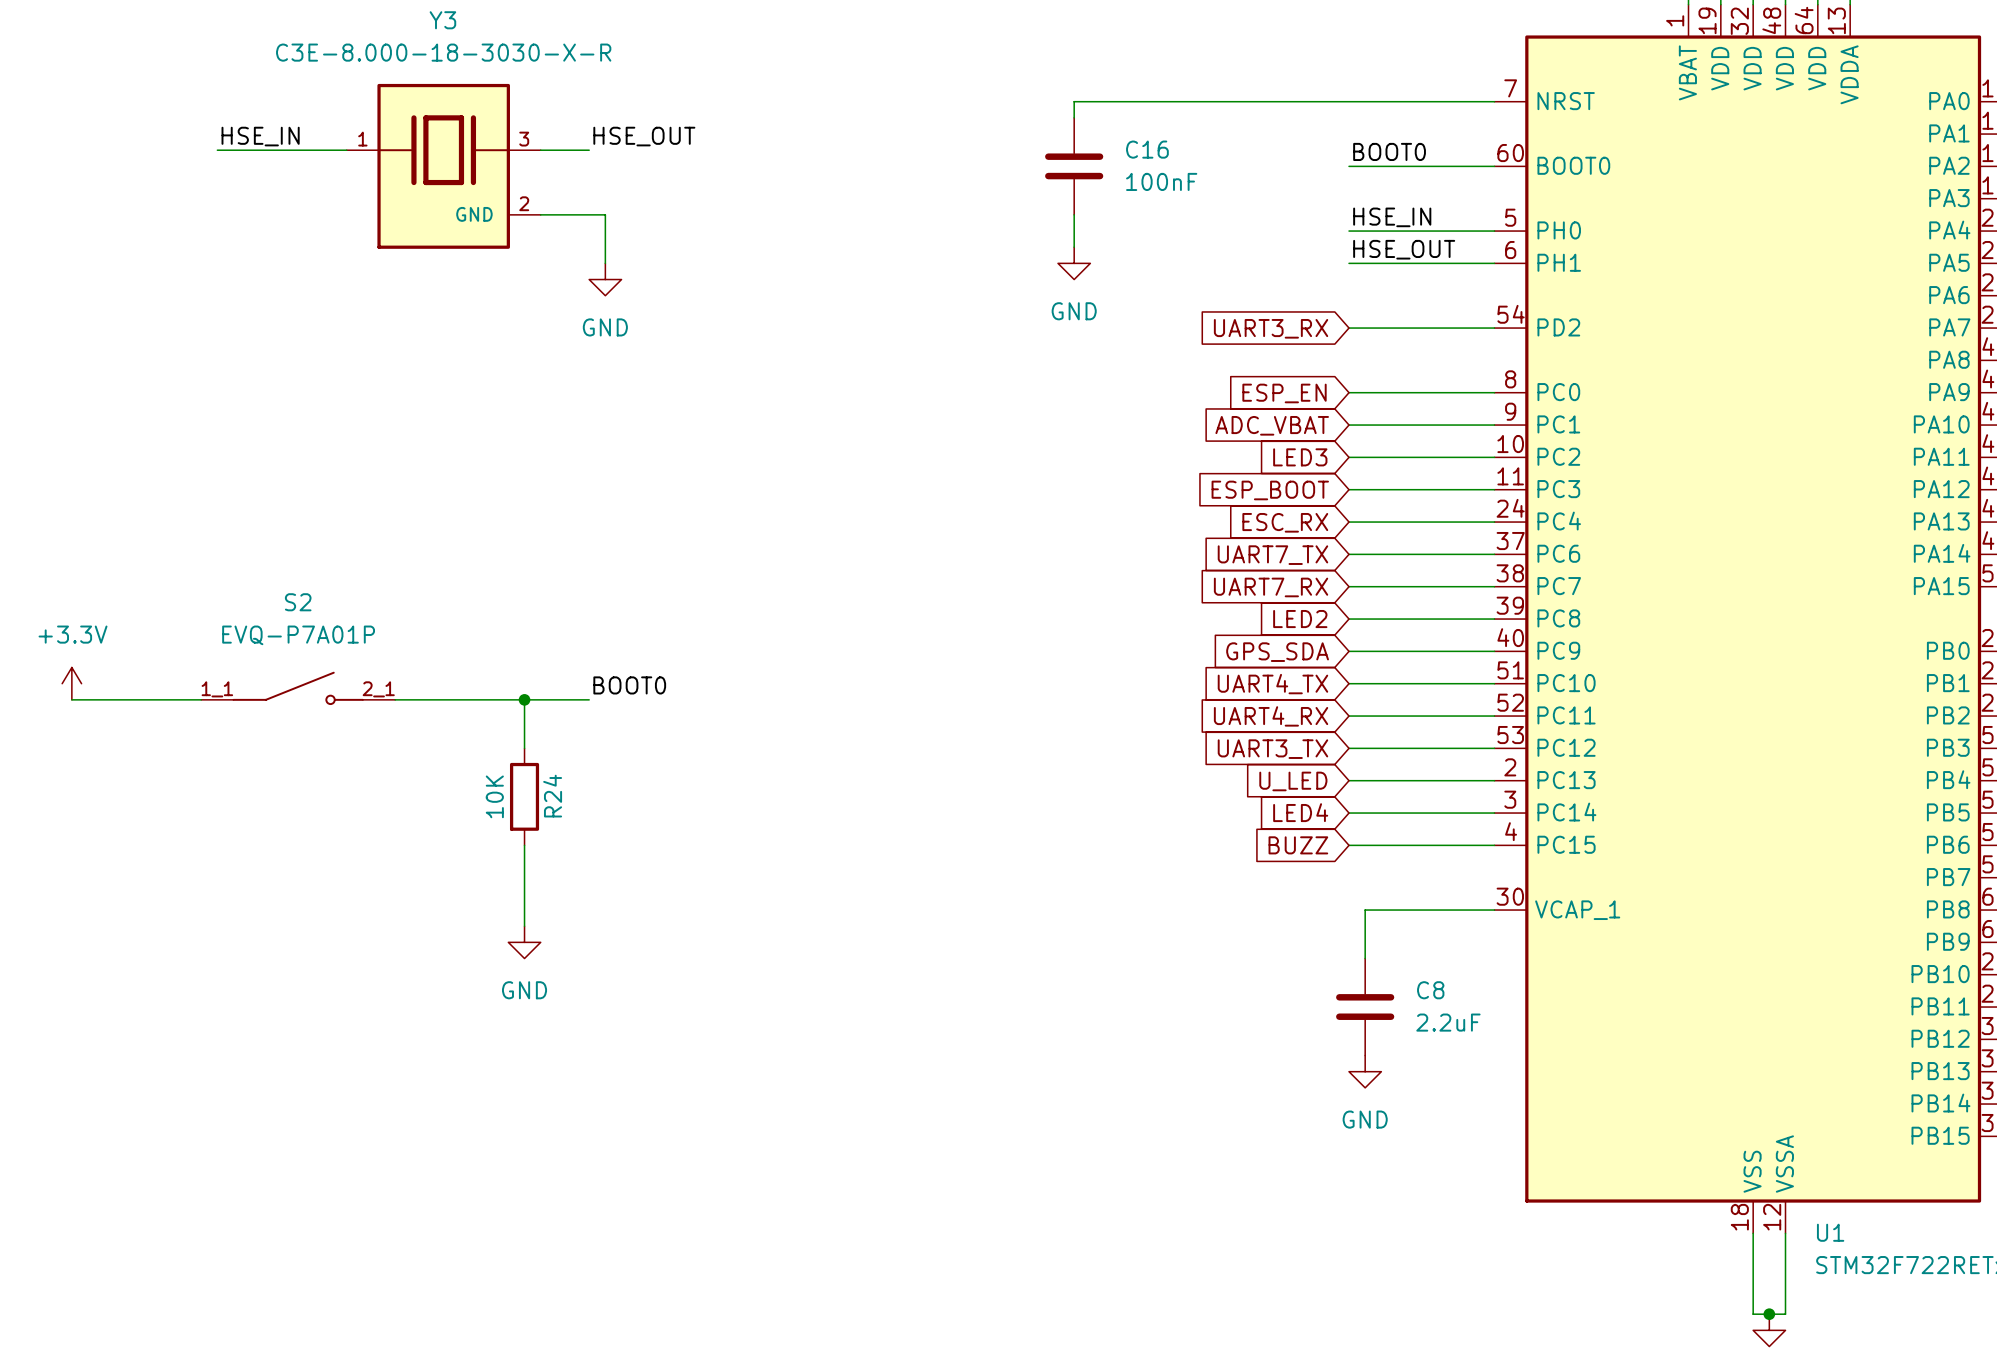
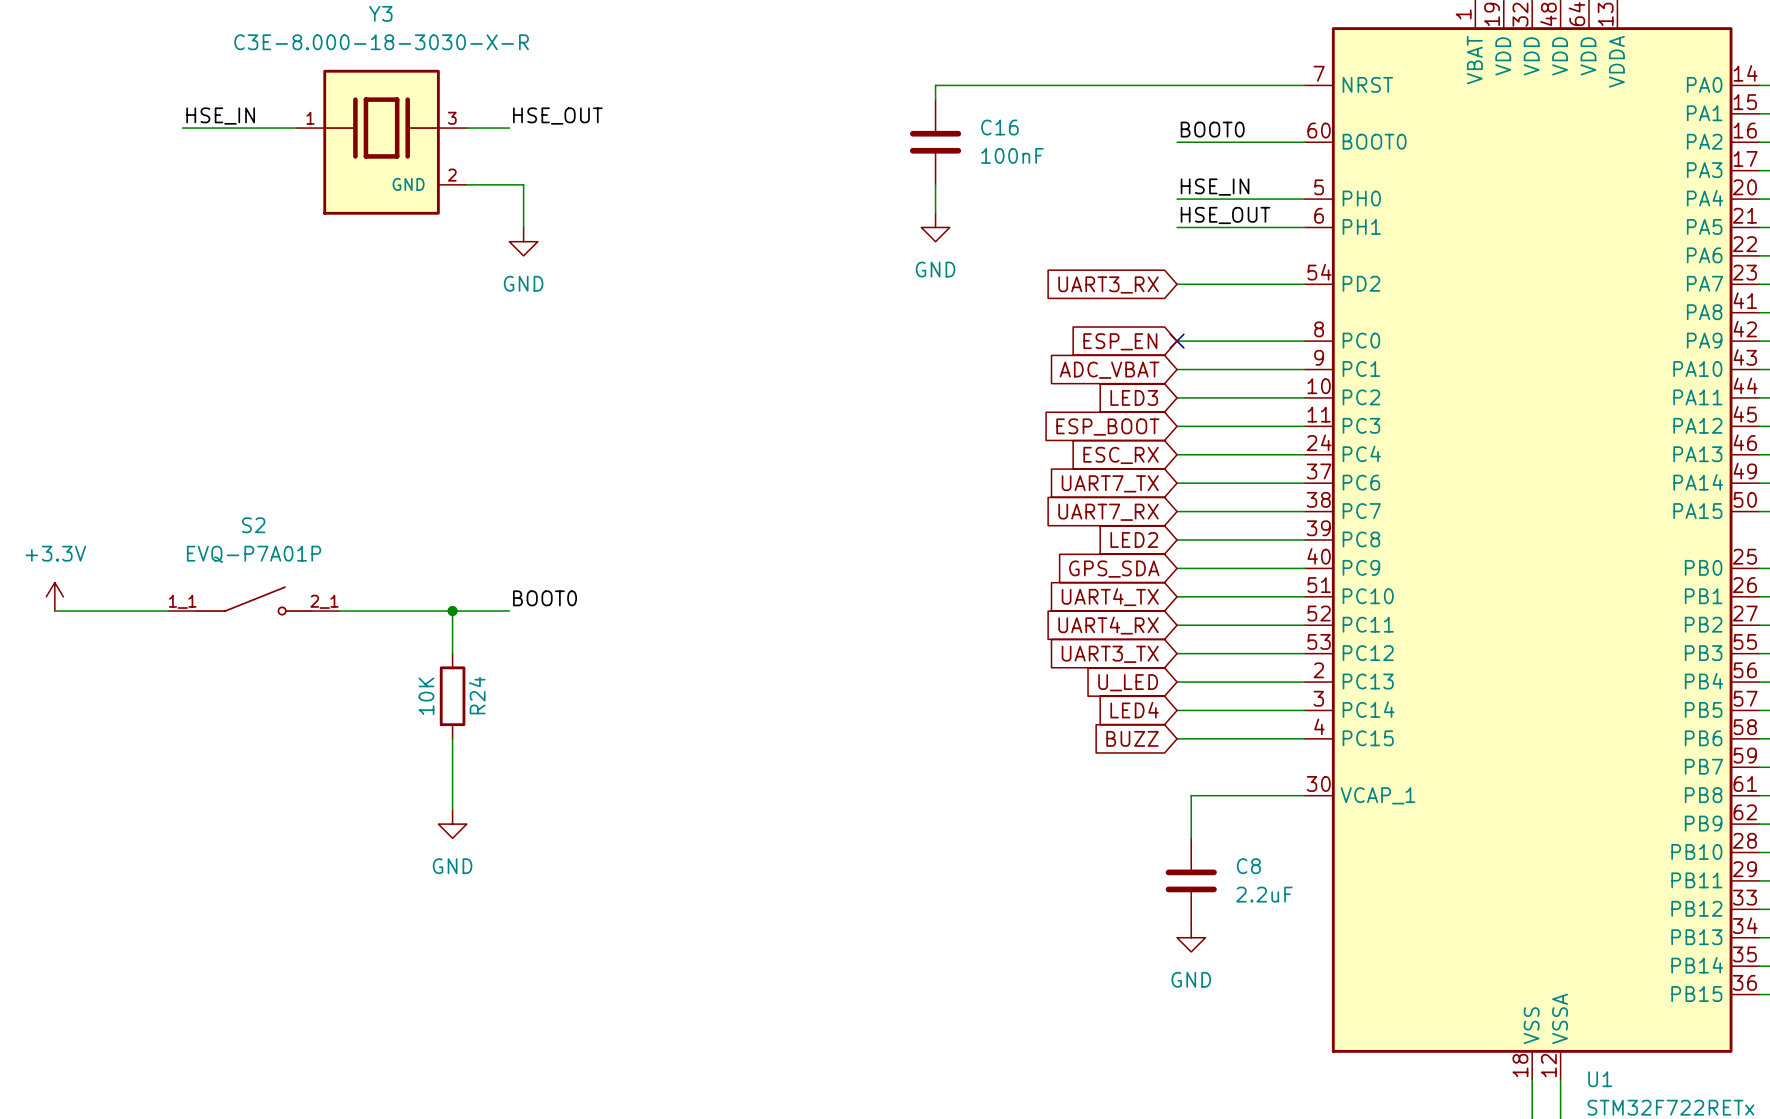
no-connect mark: none -> (1177, 341)

